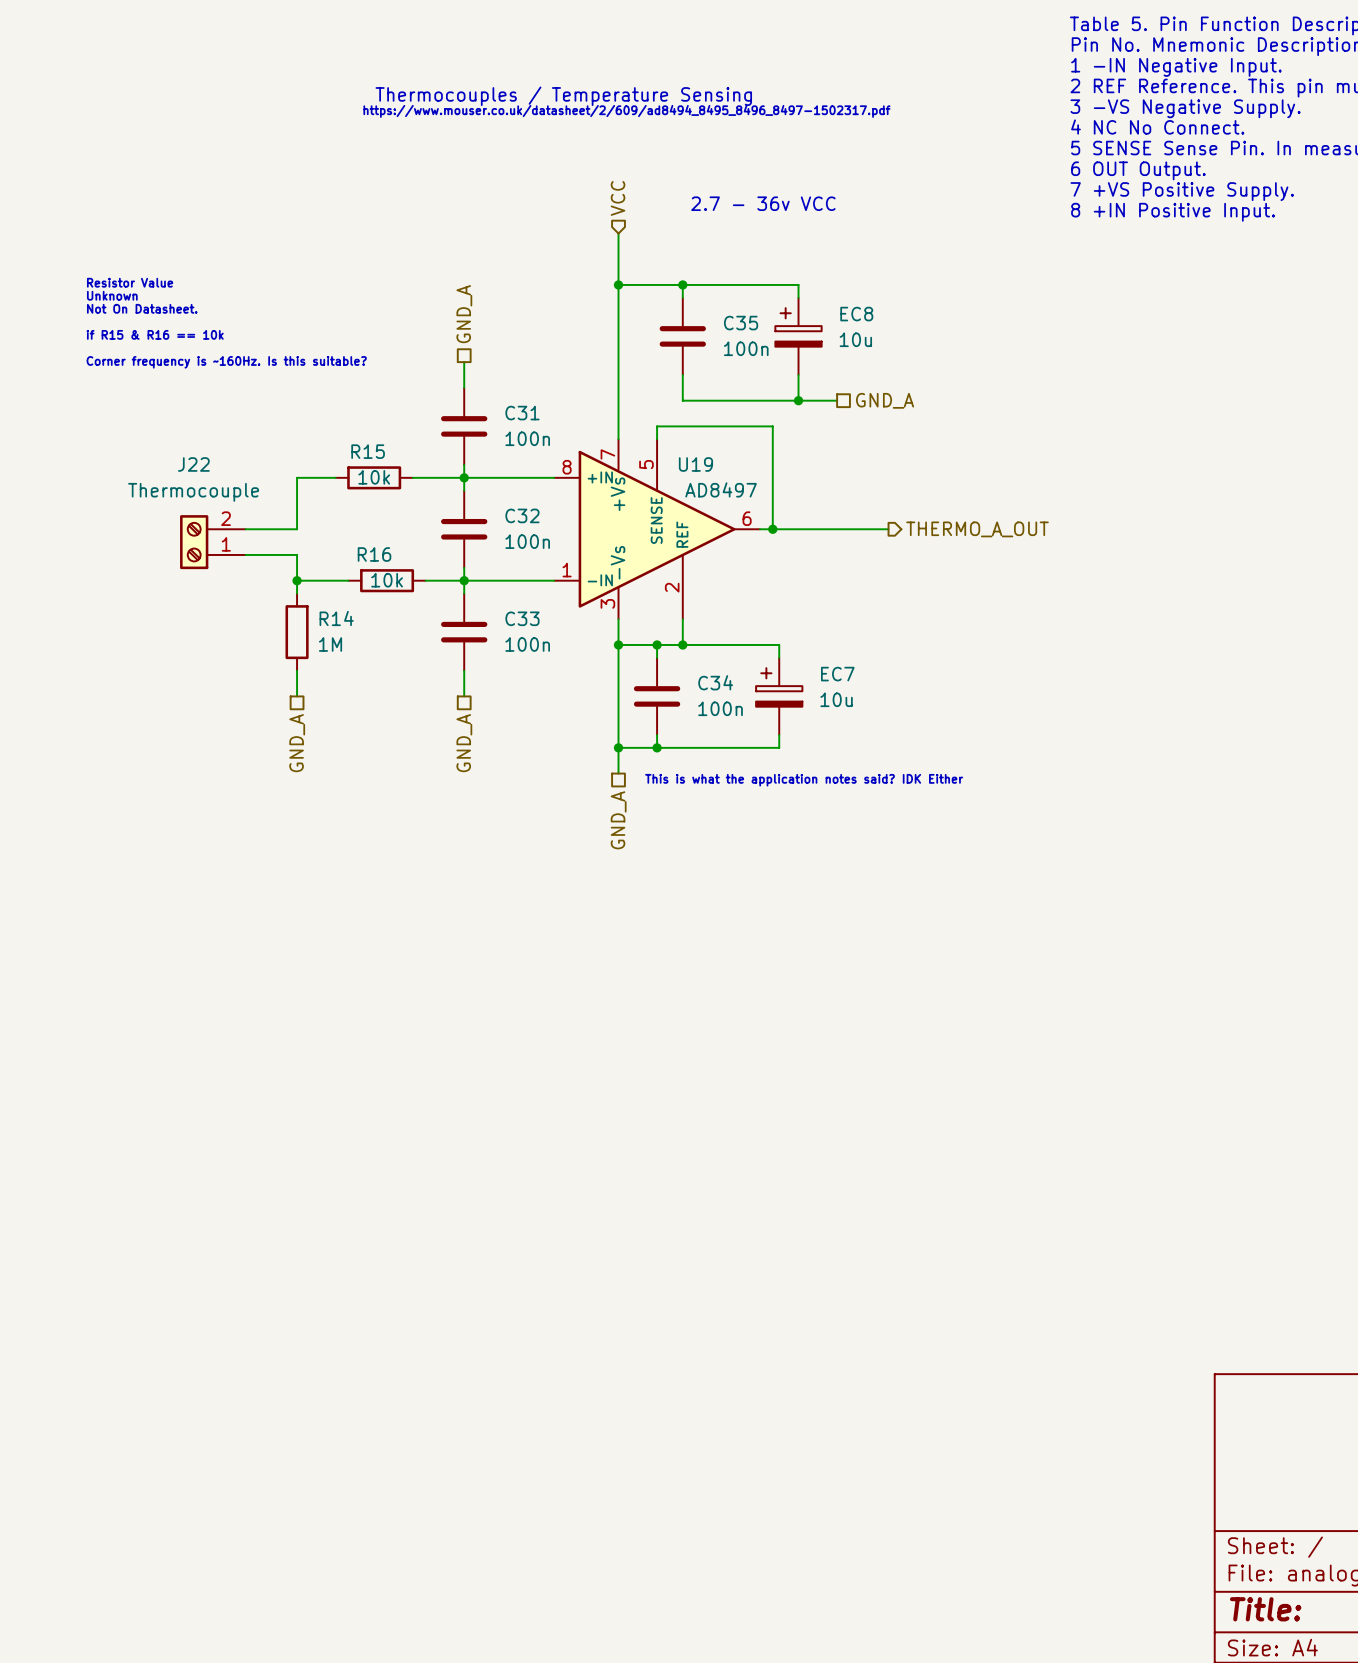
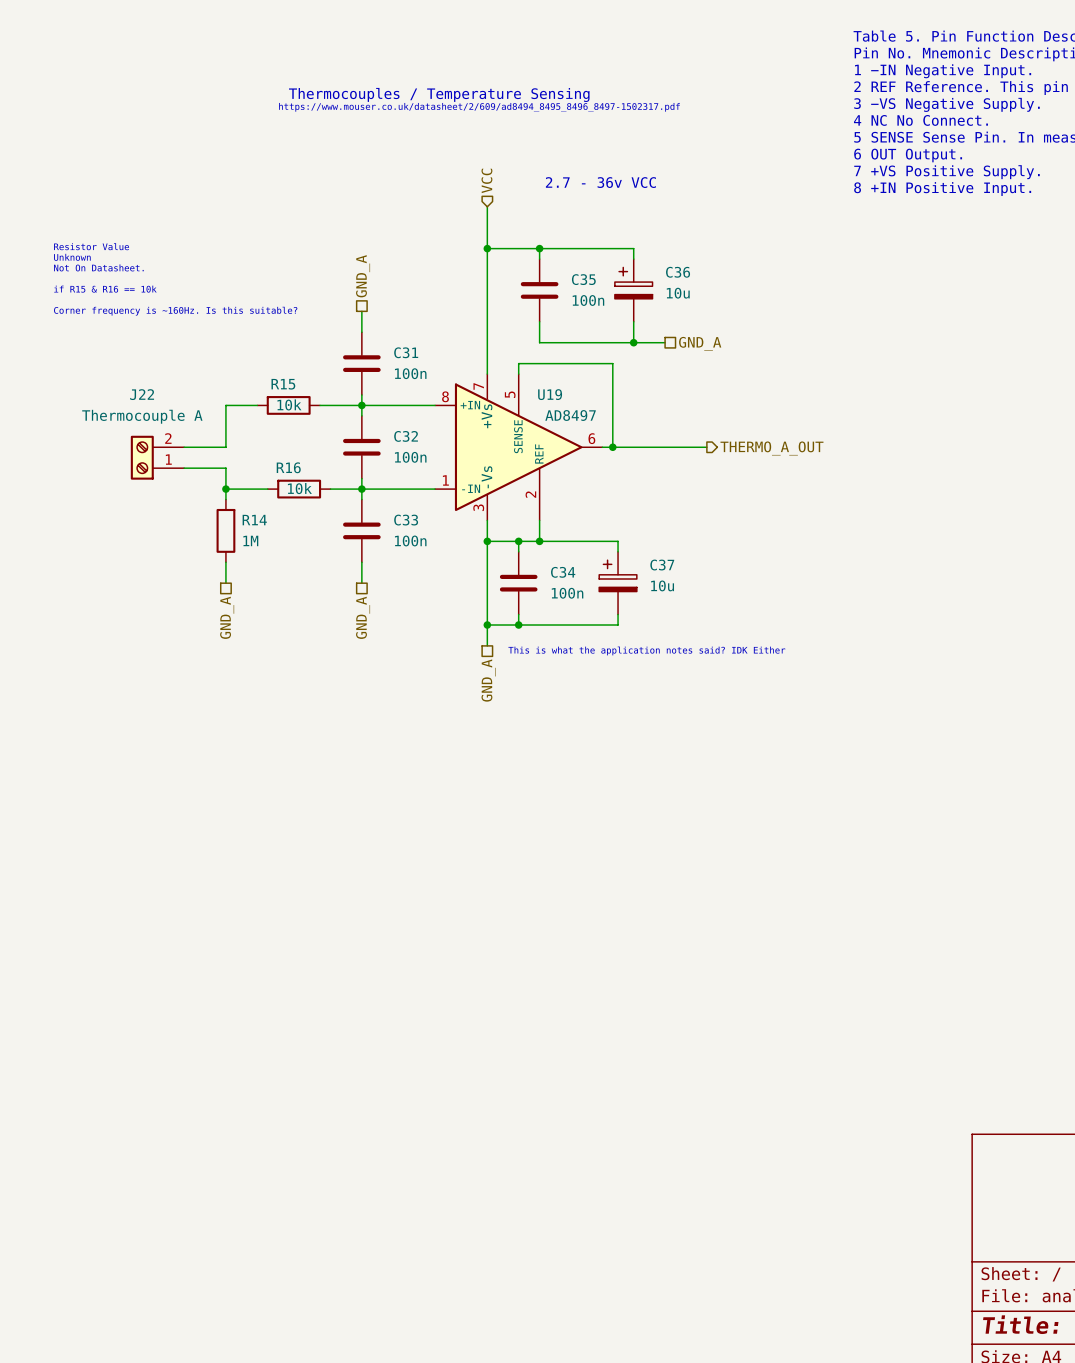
EC8 name: EC8 (856, 314) -> C36 (678, 272)
J22 value: Thermocouple (193, 492) -> Thermocouple A (142, 416)
EC7 name: EC7 (837, 674) -> C37 (662, 565)

